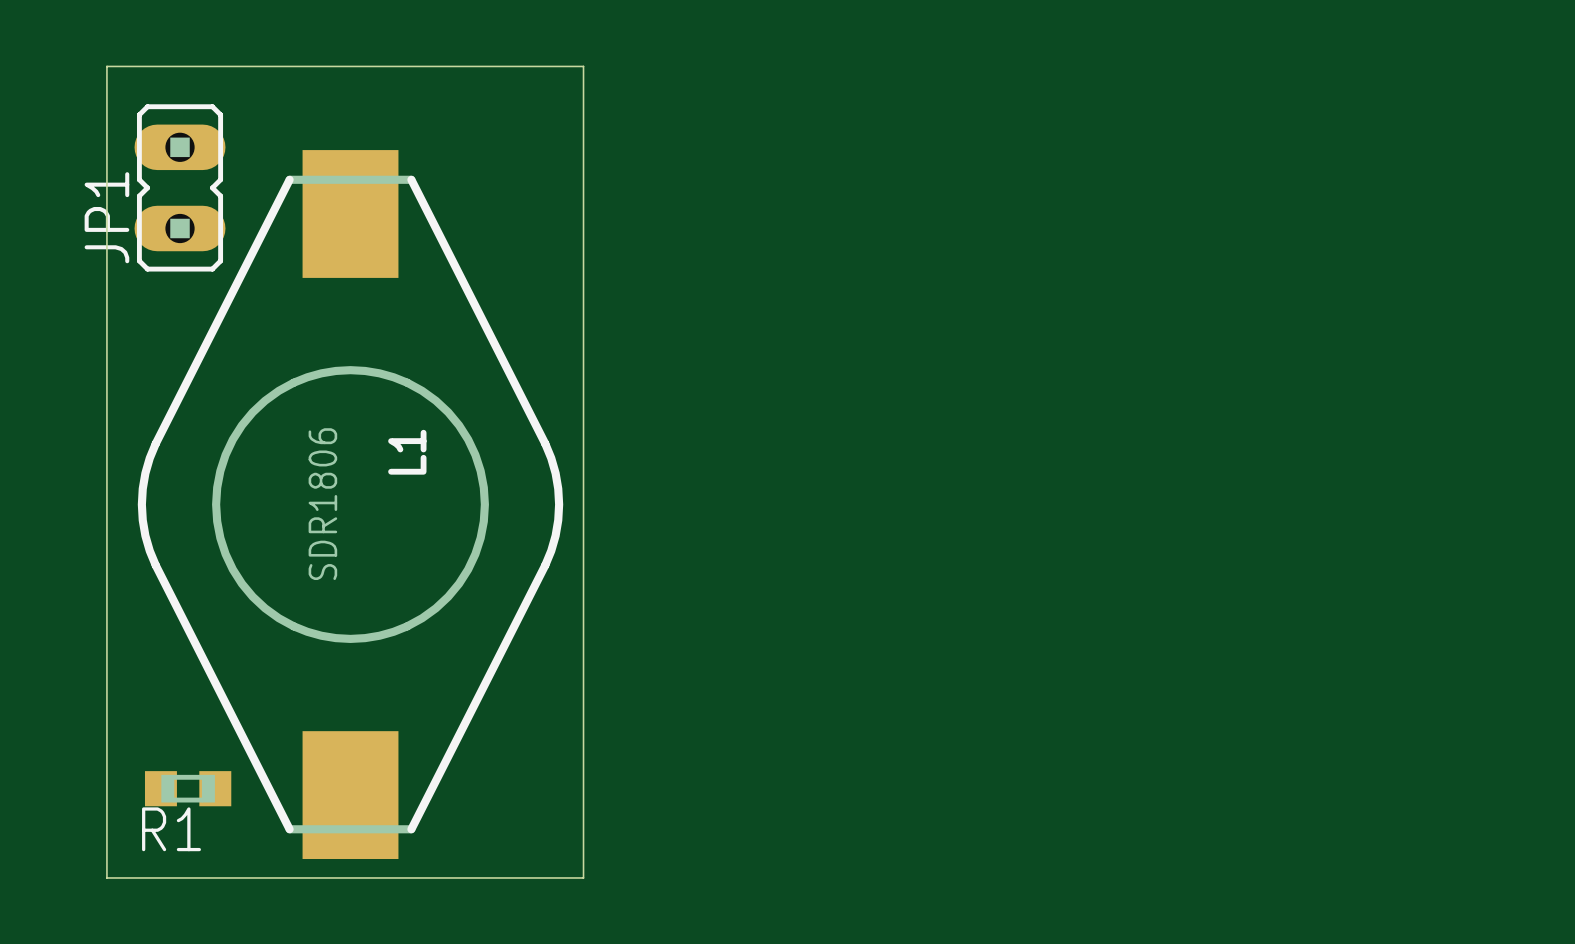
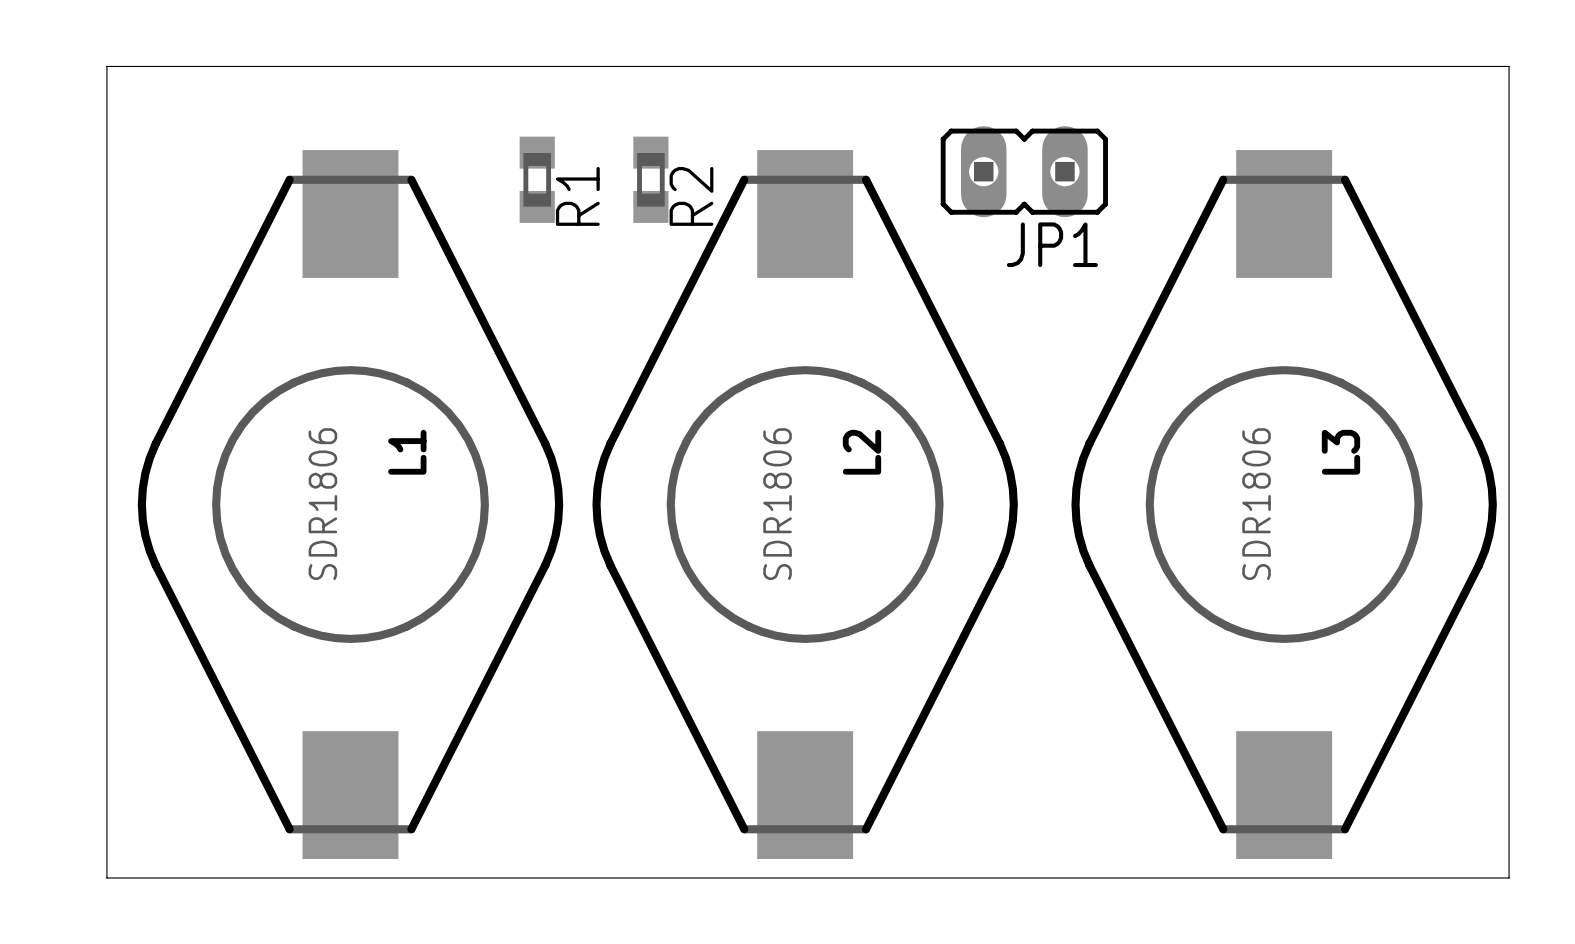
board edge: (583, 66) (583, 877) -> (583, 66) (1509, 66) (1509, 877) (583, 877)
R2: none -> (650, 179)
JP1 rotation: 0° (180, 187) -> 90° clockwise (1024, 171)
JP1 position: (180, 187) -> (1024, 171)
JP1 name position: JP1 (106, 217) -> JP1 (1052, 244)
L2: none -> SDR1806 (805, 504)
L3: none -> SDR1806 (1284, 504)
R1 rotation: 0° (188, 788) -> 90° clockwise (537, 179)
R1 position: (188, 788) -> (537, 179)
R1 name position: R1 (171, 829) -> R1 (577, 196)

